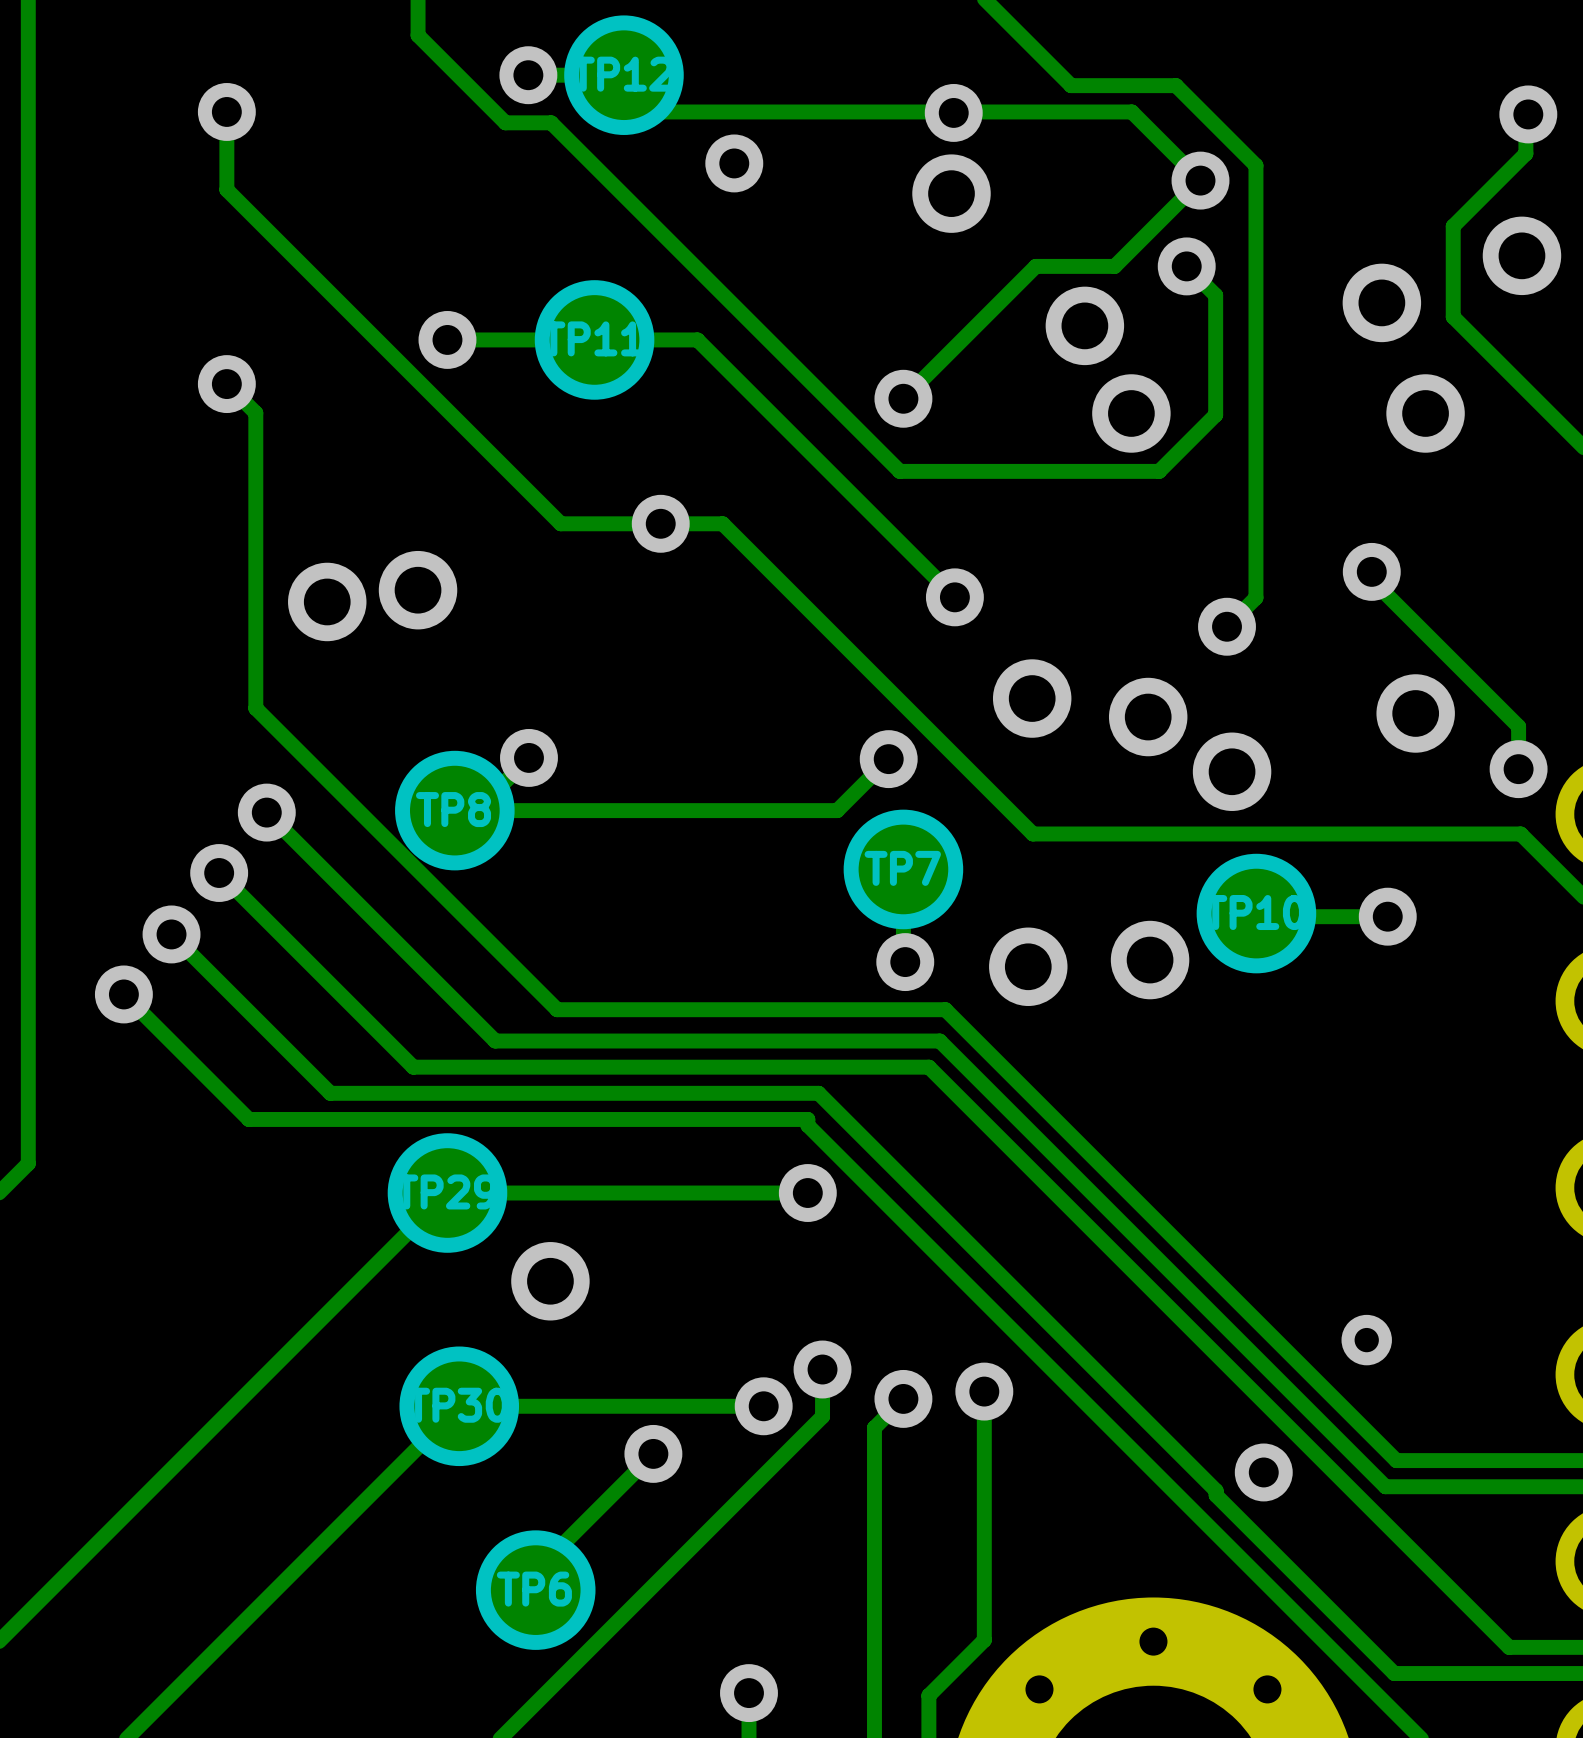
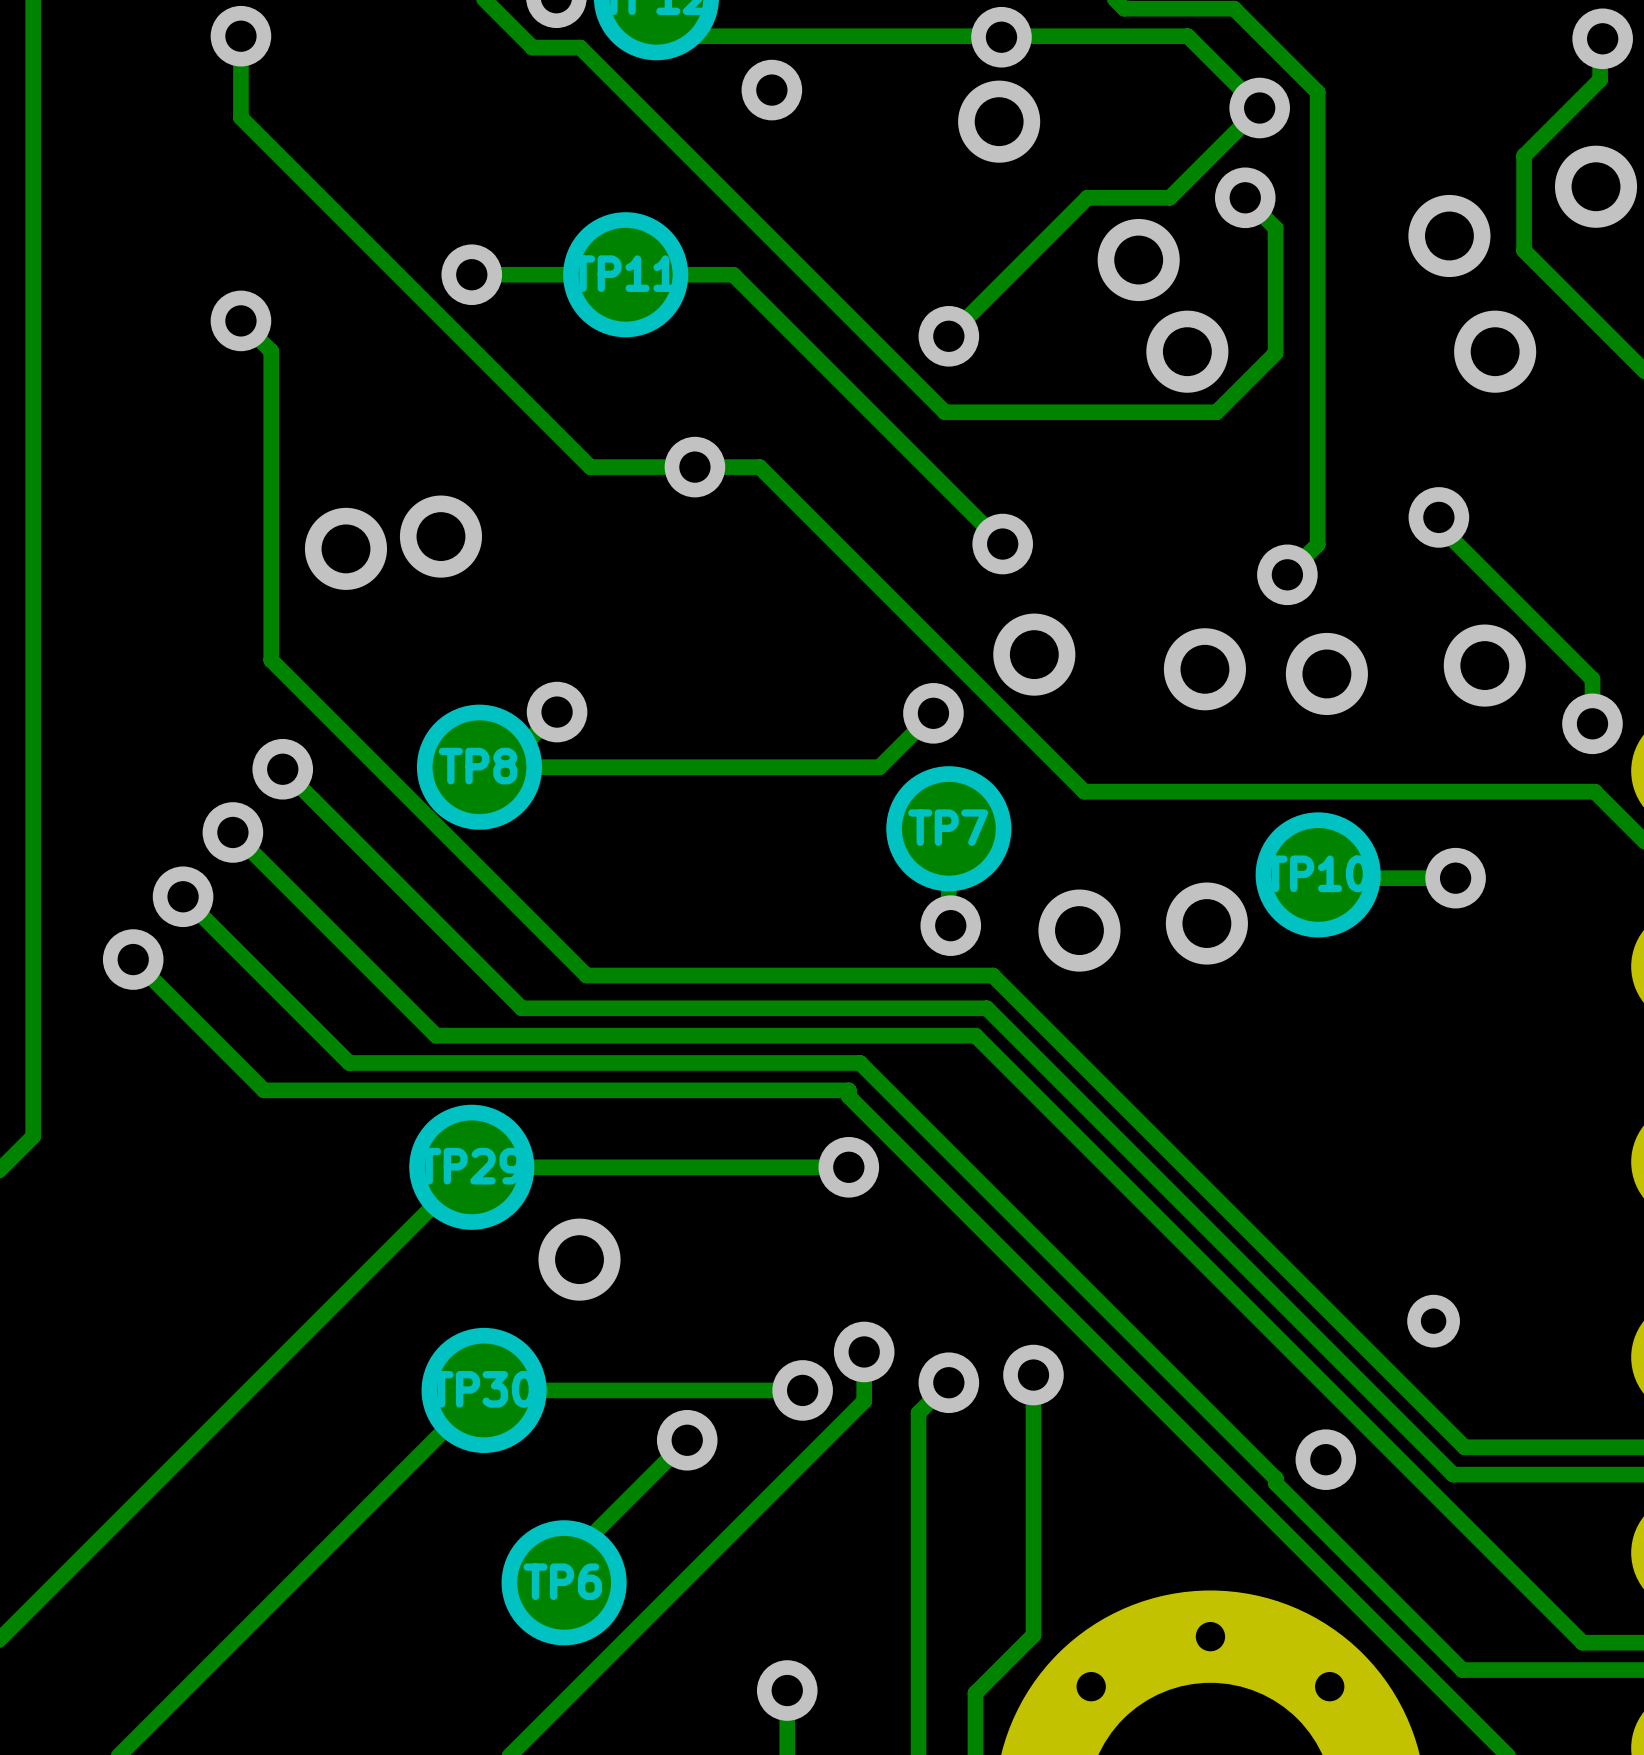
via position: (1032, 698) -> (1034, 654)
via position: (1232, 771) -> (1326, 673)

